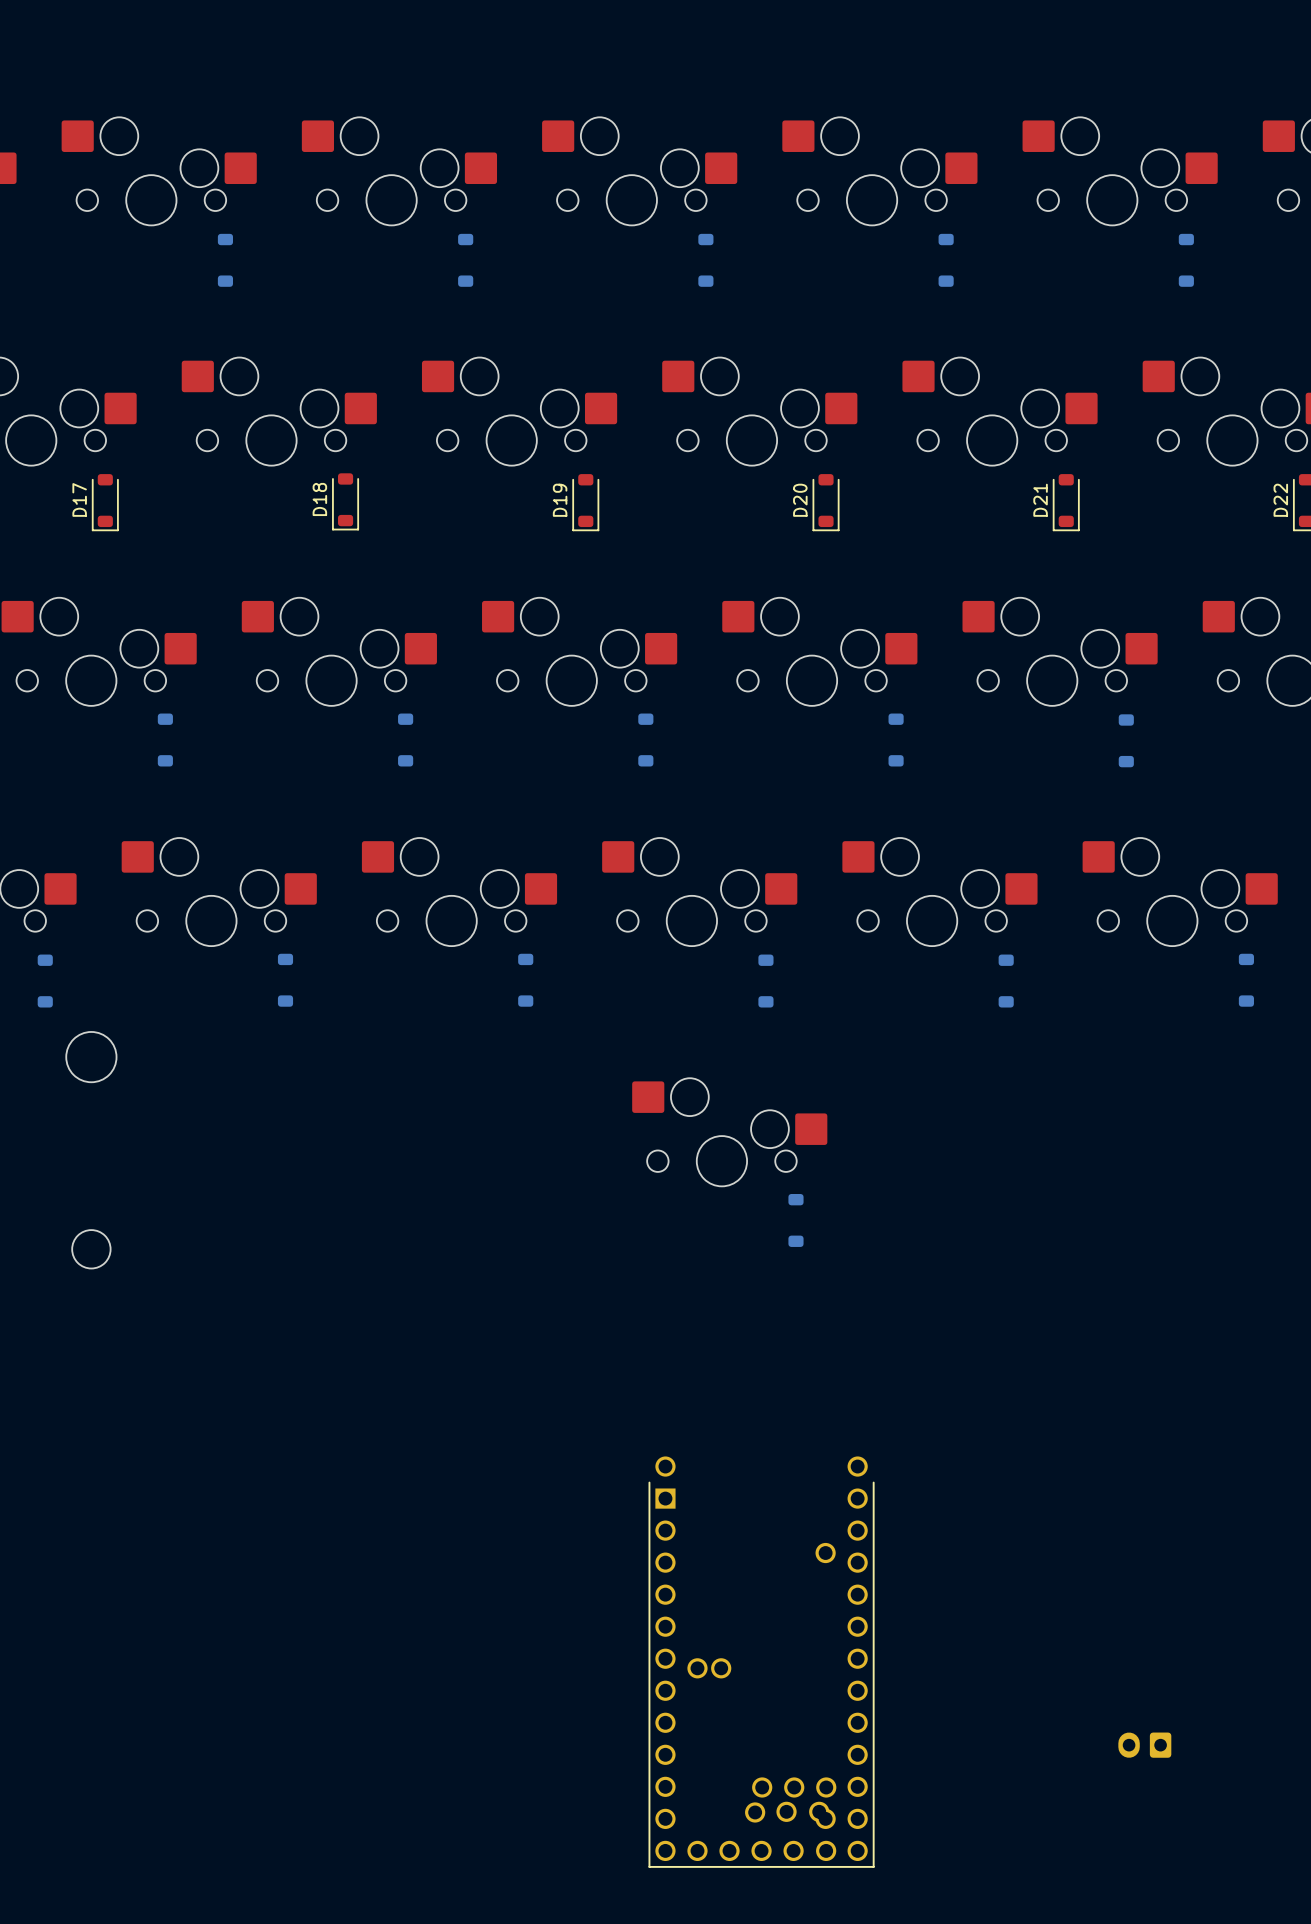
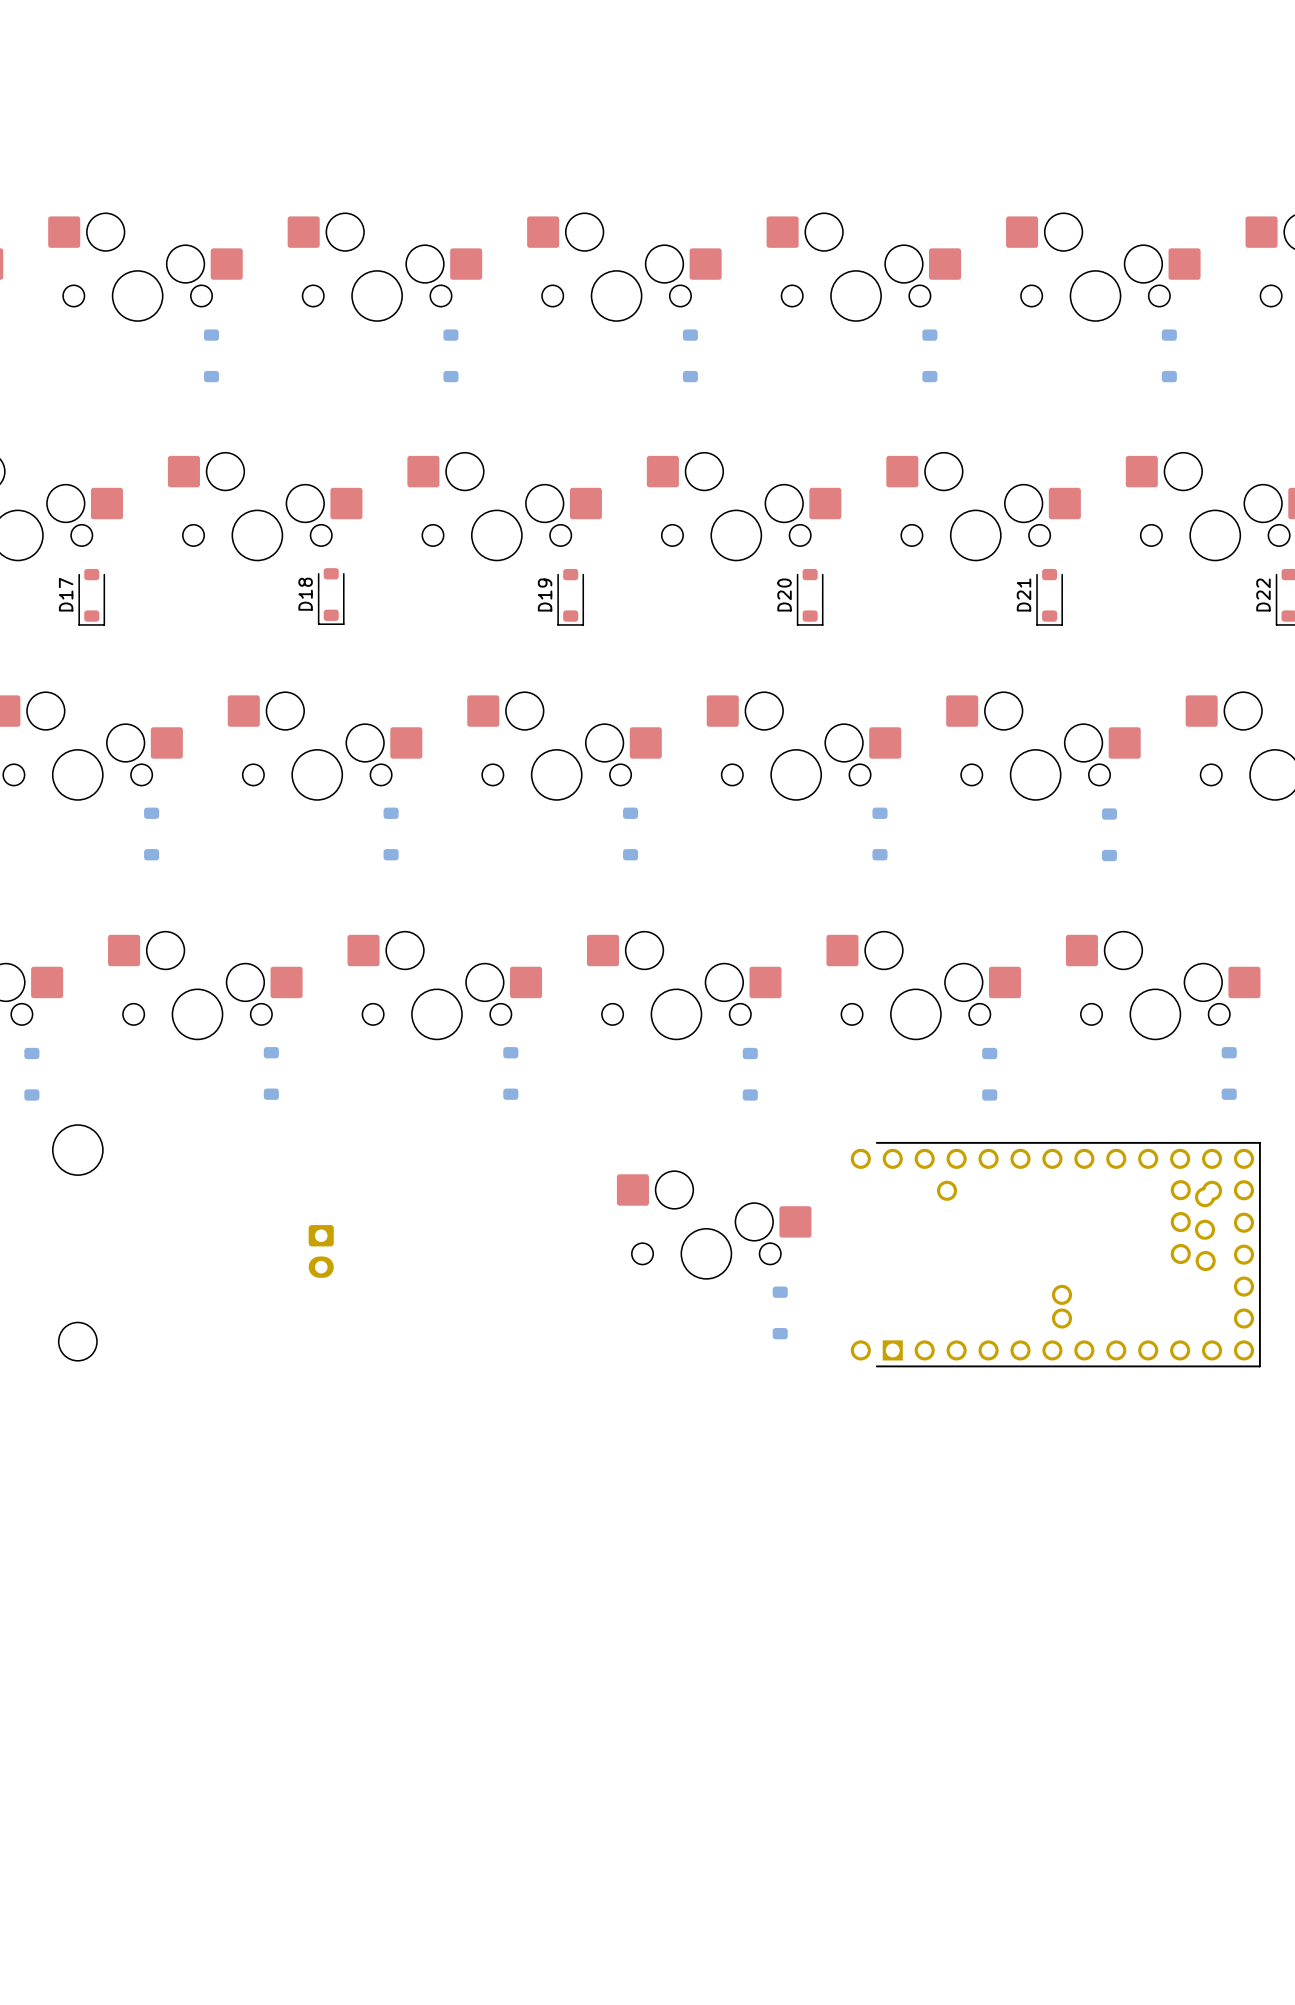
part: none -> (321, 1251)
part: none -> (1055, 1254)
part: (761, 1662) -> none
part: (1144, 1745) -> none

